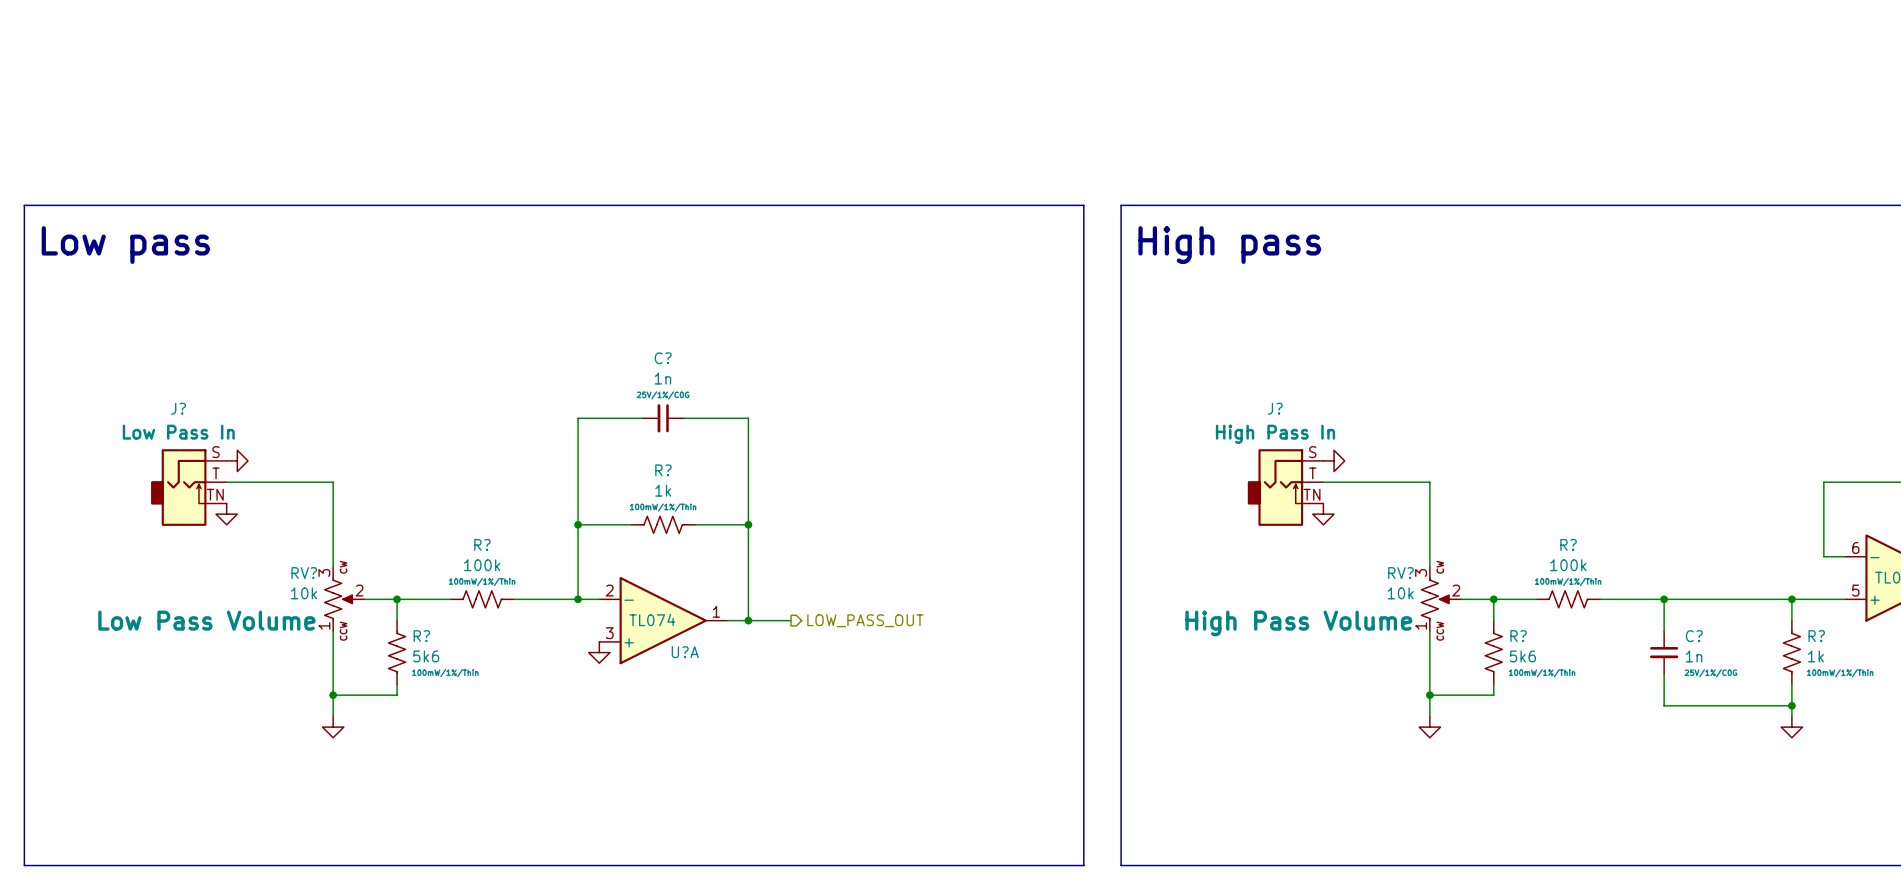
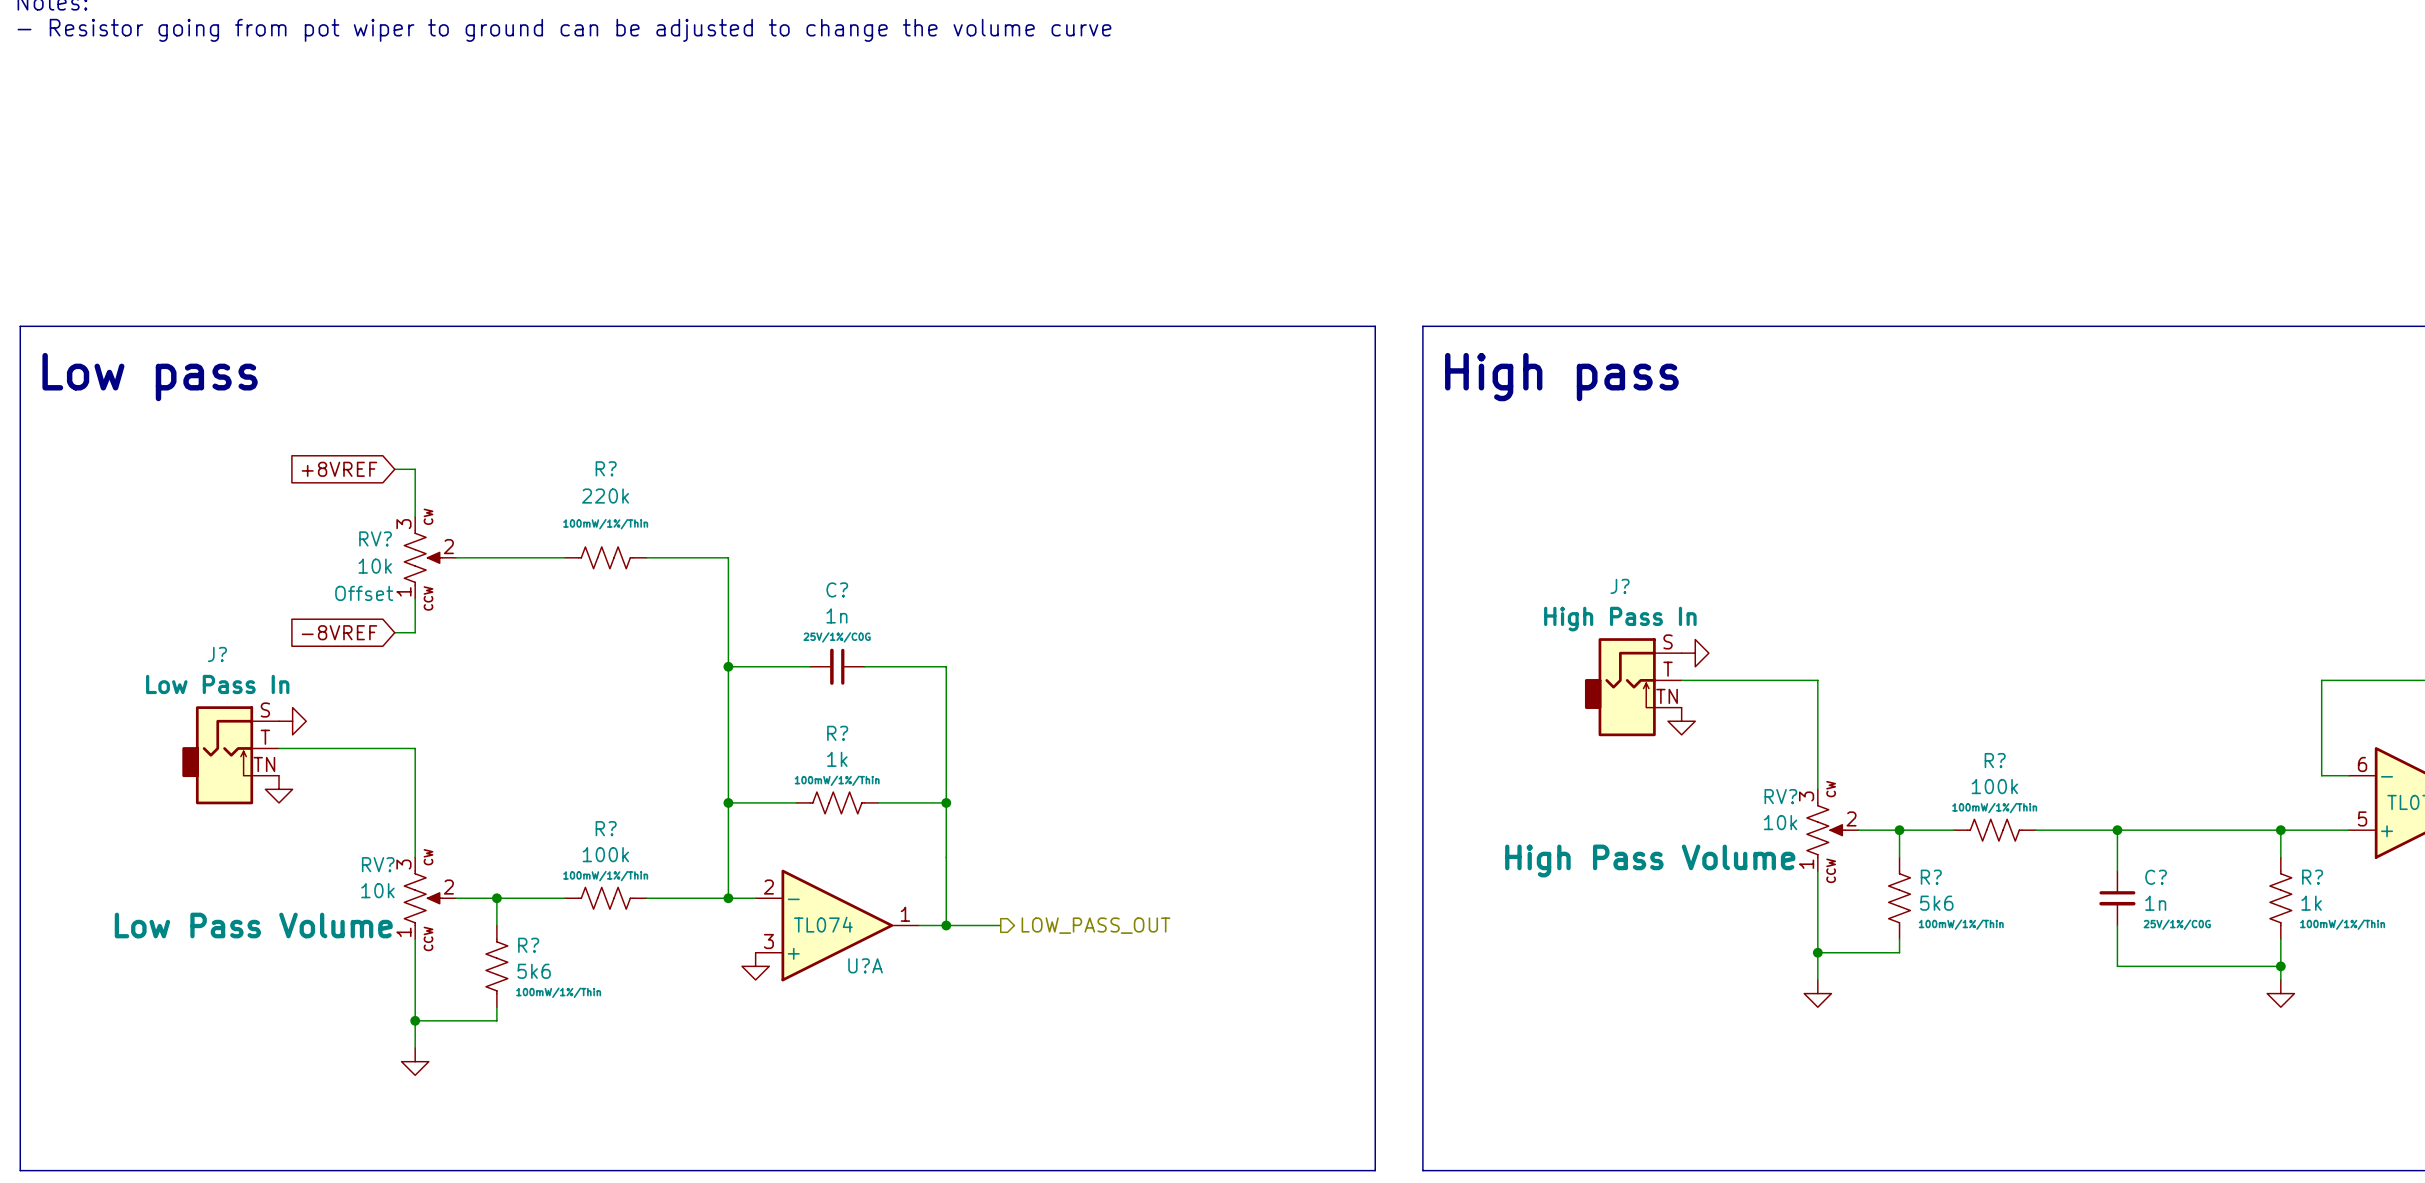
global label: none -> +8VREF (339, 469)
wire: none -> (394, 469) (415, 469) (415, 516)
RV?: none -> 10k (430, 557)
wire: none -> (456, 557) (564, 557)
R?: none -> 220k (605, 557)
wire: none -> (415, 598) (415, 632) (394, 632)
wire: (578, 418) (641, 418) -> (728, 598) (728, 557) (646, 557)
C? position: (663, 418) -> (837, 666)
wire: (684, 418) (748, 418) (748, 471) -> (864, 666) (946, 666)
global label: none -> -8VREF (339, 632)
power symbol: (237, 460) -> none
wire: none -> (728, 666) (810, 666)
junction: none -> (728, 666)
wire: (226, 482) (333, 482) (333, 535) -> (279, 748) (415, 748)
J? position: (188, 487) -> (230, 755)
power symbol rotation: 0° (226, 514) -> 90° counterclockwise (292, 721)
wire: (578, 524) (631, 524) -> (728, 802) (796, 802)
junction: (578, 524) -> none
R? position: (663, 524) -> (837, 802)
wire: (695, 524) (748, 524) -> (878, 802) (946, 802)
junction: (748, 524) -> none
power symbol: none -> (279, 789)
junction: none -> (946, 802)
RV? position: (344, 599) -> (430, 898)
wire: (365, 599) (450, 599) -> (456, 898) (564, 898)
wire: (397, 599) (397, 620) -> (496, 898) (496, 925)
junction: (397, 599) -> none
R? position: (482, 599) -> (605, 898)
wire: (514, 599) (599, 599) -> (646, 898) (755, 898)
wire: none -> (728, 830) (728, 898)
junction position: (578, 599) -> (728, 802)
U?A position: (663, 620) -> (837, 925)
wire: (727, 620) (791, 620) -> (919, 925) (1000, 925)
wire: none -> (946, 857) (946, 925)
junction: (748, 620) -> none
hierarchical label position: LOW_PASS_OUT (865, 620) -> LOW_PASS_OUT (1095, 925)
wire: (333, 631) (333, 684) -> (415, 789) (415, 857)
junction: none -> (496, 898)
R? position: (397, 652) -> (496, 966)
junction: none -> (728, 898)
power symbol position: (599, 652) -> (755, 966)
junction: none -> (946, 925)
wire: (397, 684) (397, 695) (333, 695) -> (496, 1007) (496, 1020) (415, 1020)
junction: (333, 695) -> none
wire: none -> (415, 979) (415, 1048)
power symbol position: (333, 727) -> (415, 1061)
junction: none -> (415, 1020)

